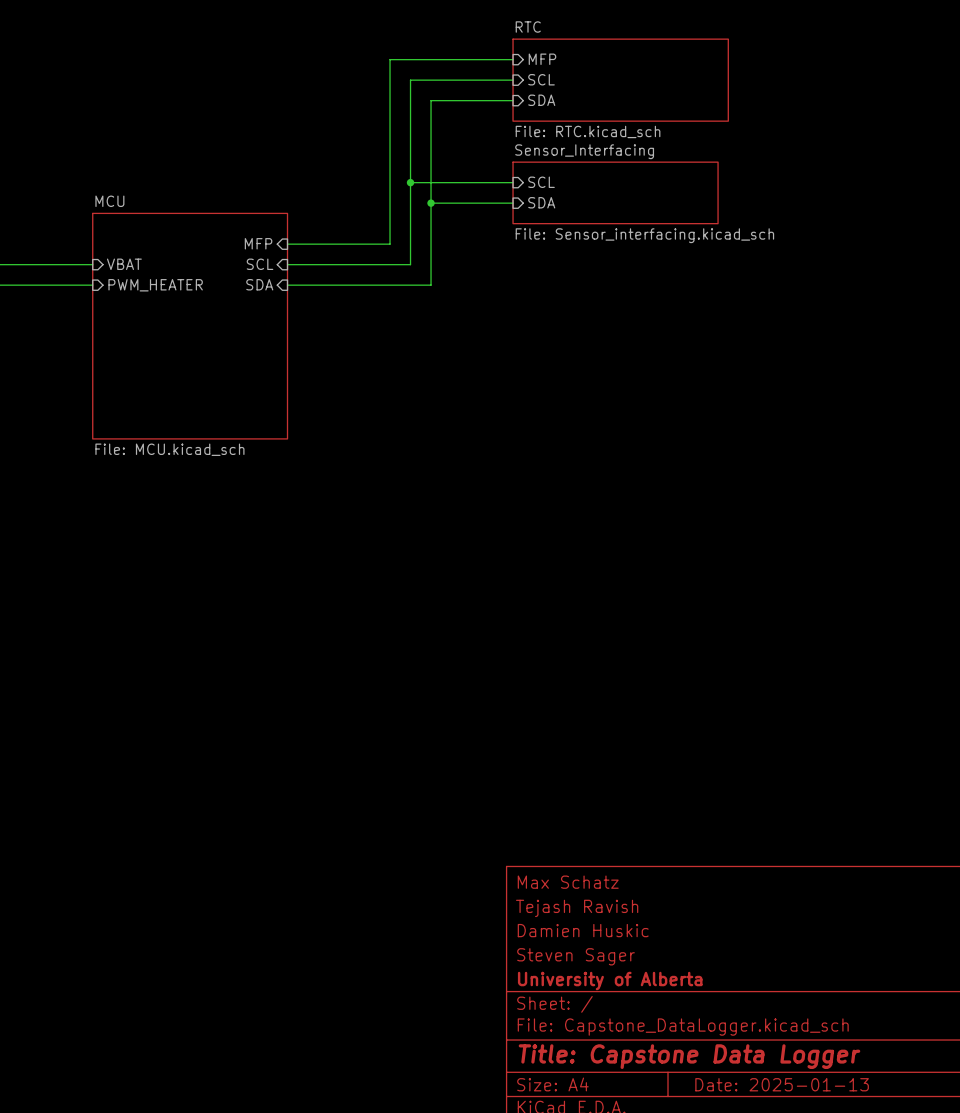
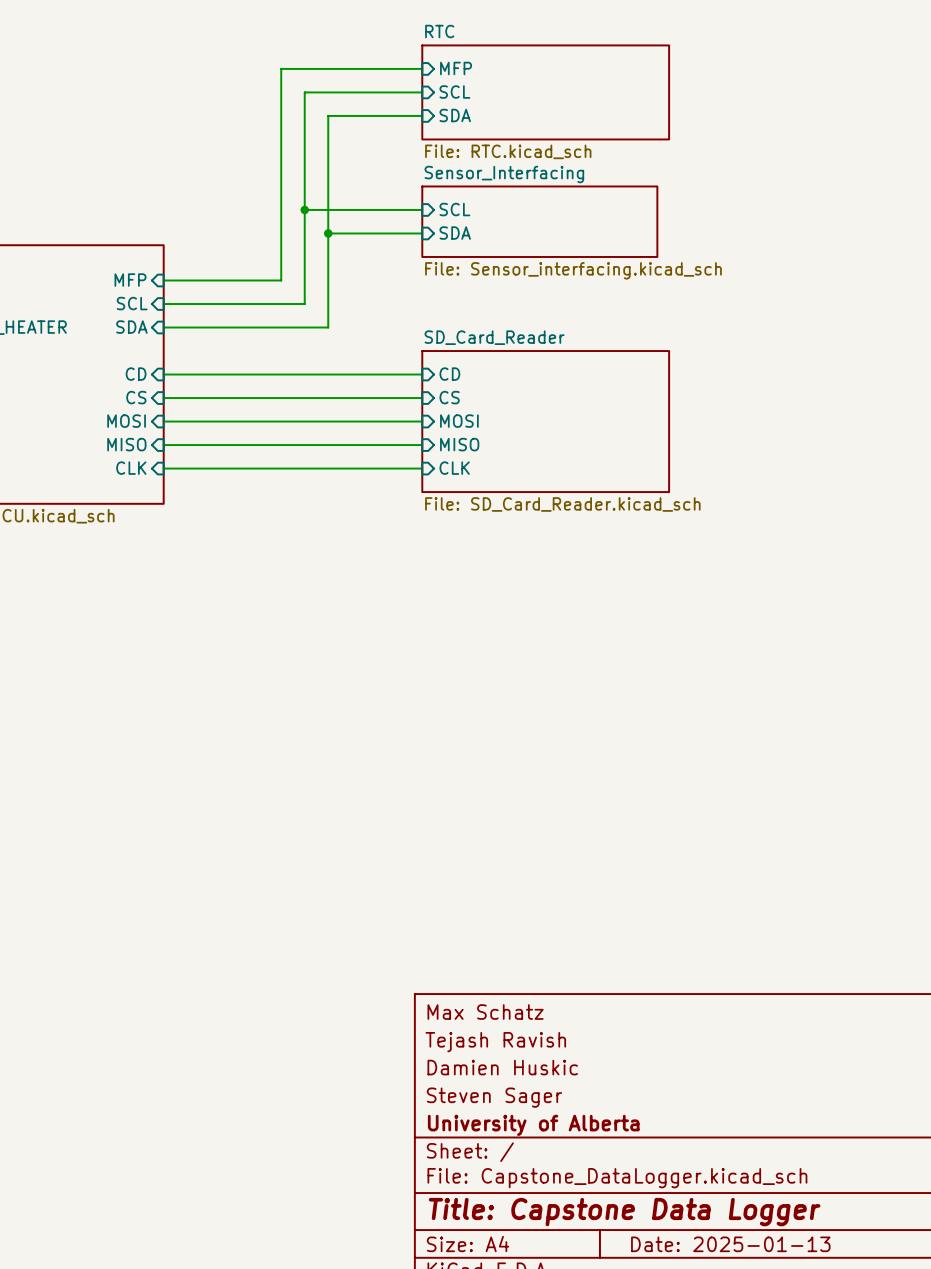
sheet pin: none -> CD (136, 374)
sheet pin: none -> CD (449, 374)
wire: none -> (163, 374) (422, 374)
sheet pin: none -> CS (136, 397)
wire: none -> (163, 398) (422, 398)
sheet pin: none -> CS (449, 397)
sheet pin: none -> MOSI (126, 421)
sheet pin: none -> MOSI (459, 421)
wire: none -> (163, 421) (422, 421)
sheet SD_Card_Reader: none -> File: SD_Card_Reader.kicad_sch (545, 421)
sheet pin: none -> MISO (126, 444)
wire: none -> (163, 445) (422, 445)
sheet pin: none -> MISO (459, 444)
sheet pin: none -> CLK (131, 468)
sheet pin: none -> CLK (454, 468)
wire: none -> (163, 468) (422, 468)

